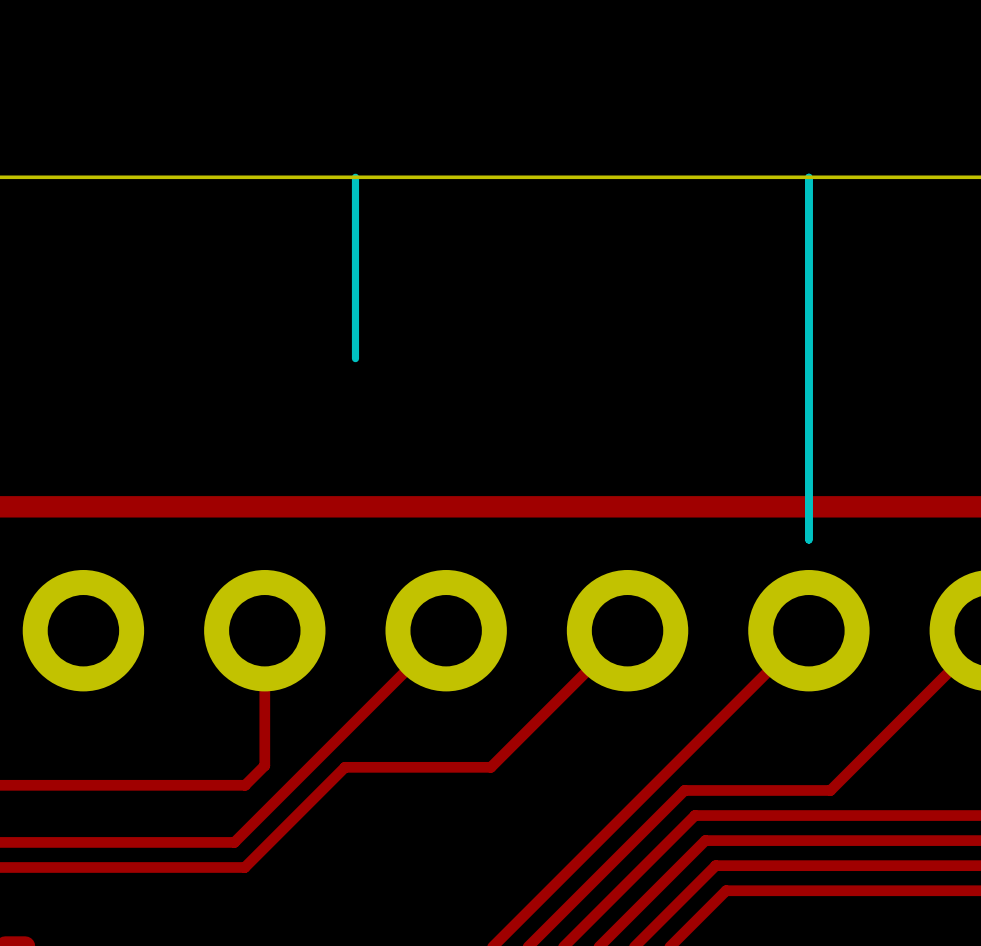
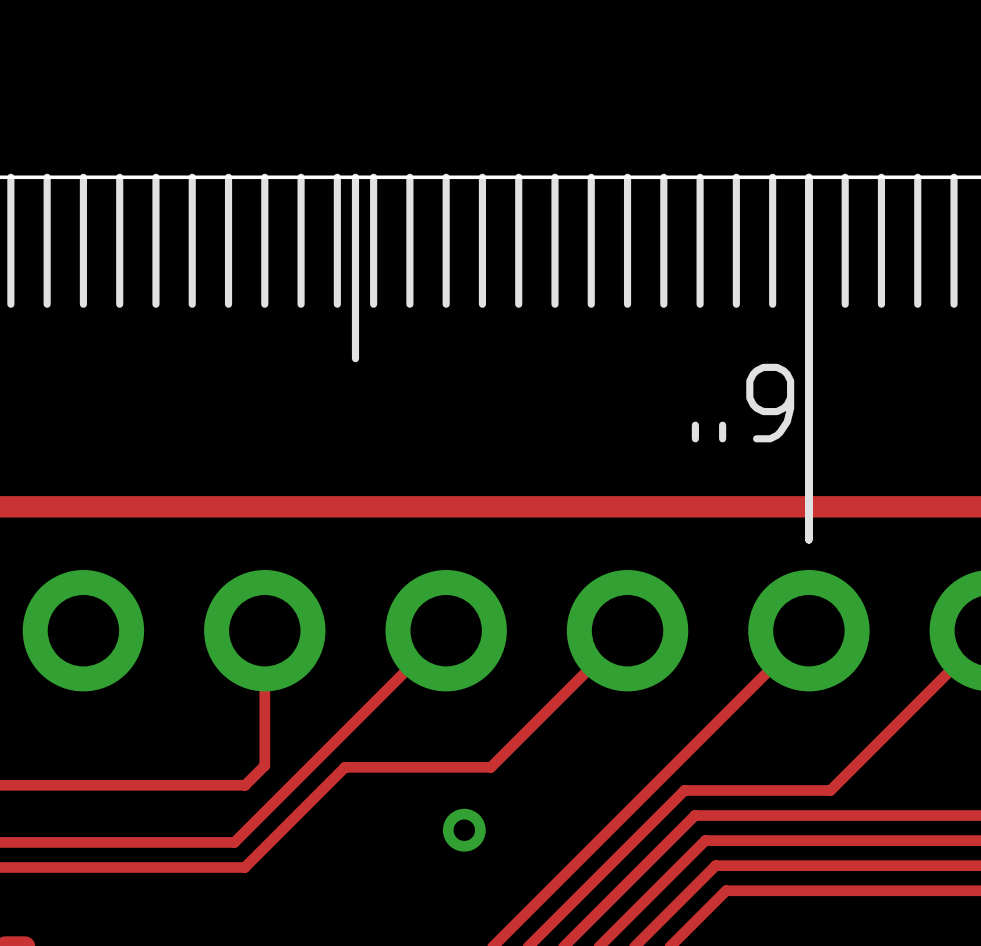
line: none -> (10, 177) (10, 304)
line: none -> (47, 177) (47, 304)
line: none -> (83, 177) (83, 304)
line: none -> (119, 177) (119, 304)
line: none -> (155, 177) (155, 304)
line: none -> (192, 177) (192, 304)
line: none -> (228, 177) (228, 304)
line: none -> (264, 177) (264, 304)
line: none -> (301, 177) (301, 304)
line: none -> (337, 177) (337, 304)
line: none -> (373, 177) (373, 304)
line: none -> (409, 177) (409, 304)
line: none -> (446, 177) (446, 304)
line: none -> (482, 177) (482, 304)
line: none -> (518, 177) (518, 304)
line: none -> (554, 177) (554, 304)
line: none -> (591, 177) (591, 304)
line: none -> (627, 177) (627, 304)
line: none -> (663, 177) (663, 304)
line: none -> (700, 177) (700, 304)
line: none -> (736, 177) (736, 304)
line: none -> (772, 177) (772, 304)
line: none -> (845, 177) (845, 304)
line: none -> (881, 177) (881, 304)
line: none -> (917, 177) (917, 304)
line: none -> (954, 177) (954, 304)
text: none -> 6" (743, 403)
via: none -> (464, 830)

